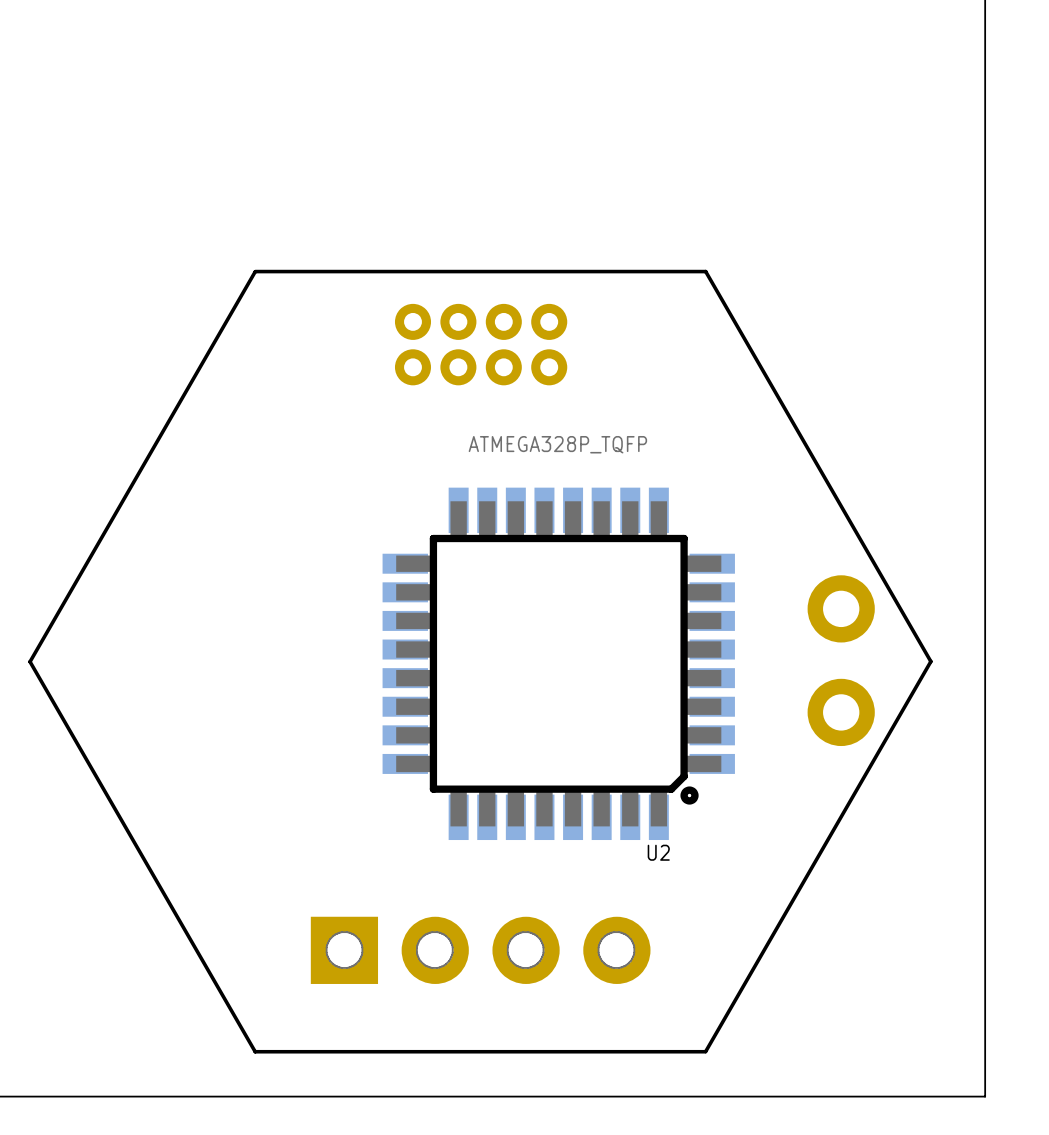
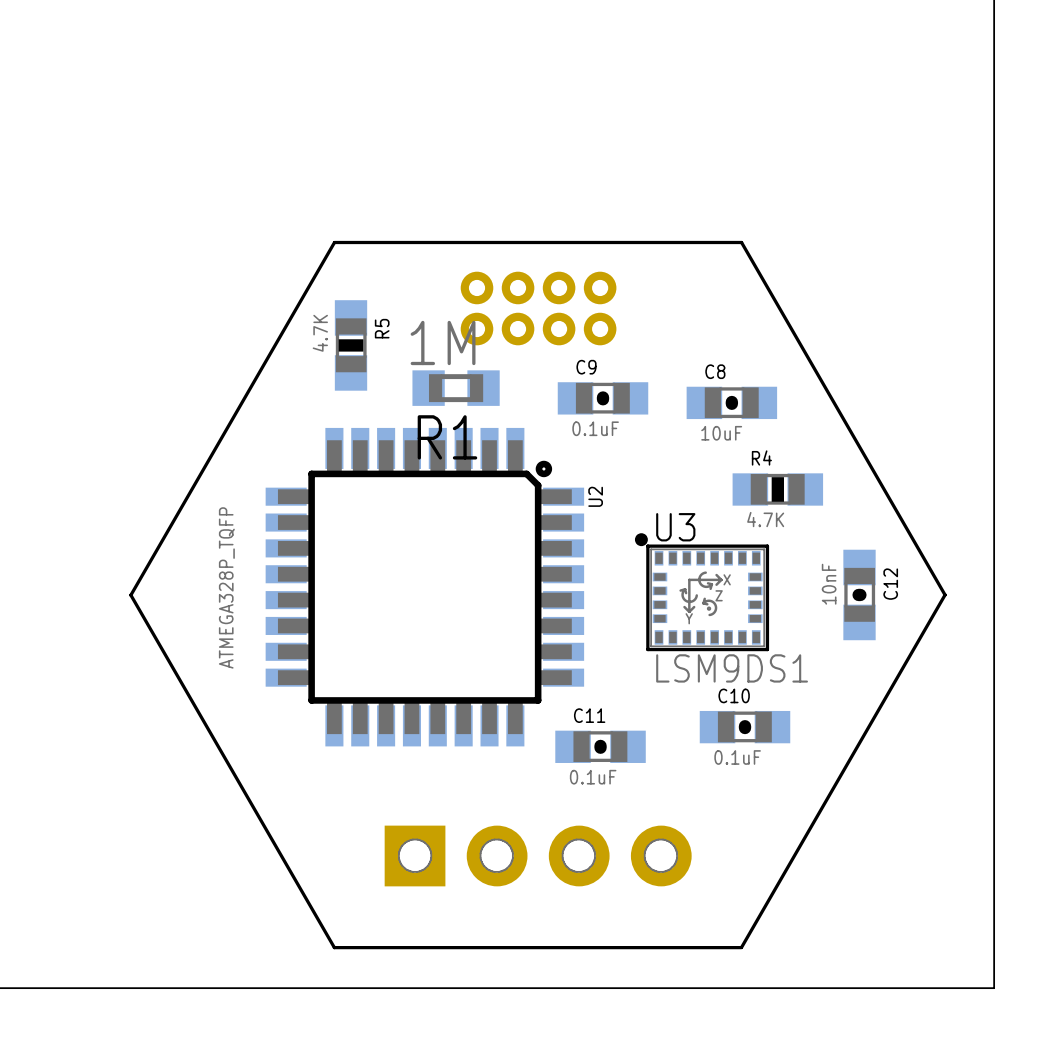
R5: none -> 4.7K (351, 345)
R1: none -> 1M (456, 388)
C9: none -> 0.1uF (603, 398)
C8: none -> 10uF (731, 402)
R4: none -> 4.7K (777, 489)
U3: none -> LSM9DS1 (702, 592)
part: (841, 660) -> none
C12: none -> 10nF (859, 594)
U2 rotation: 0° (558, 663) -> 90° counterclockwise (424, 587)
C10: none -> 0.1uF (745, 727)
C11: none -> 0.1uF (600, 746)

